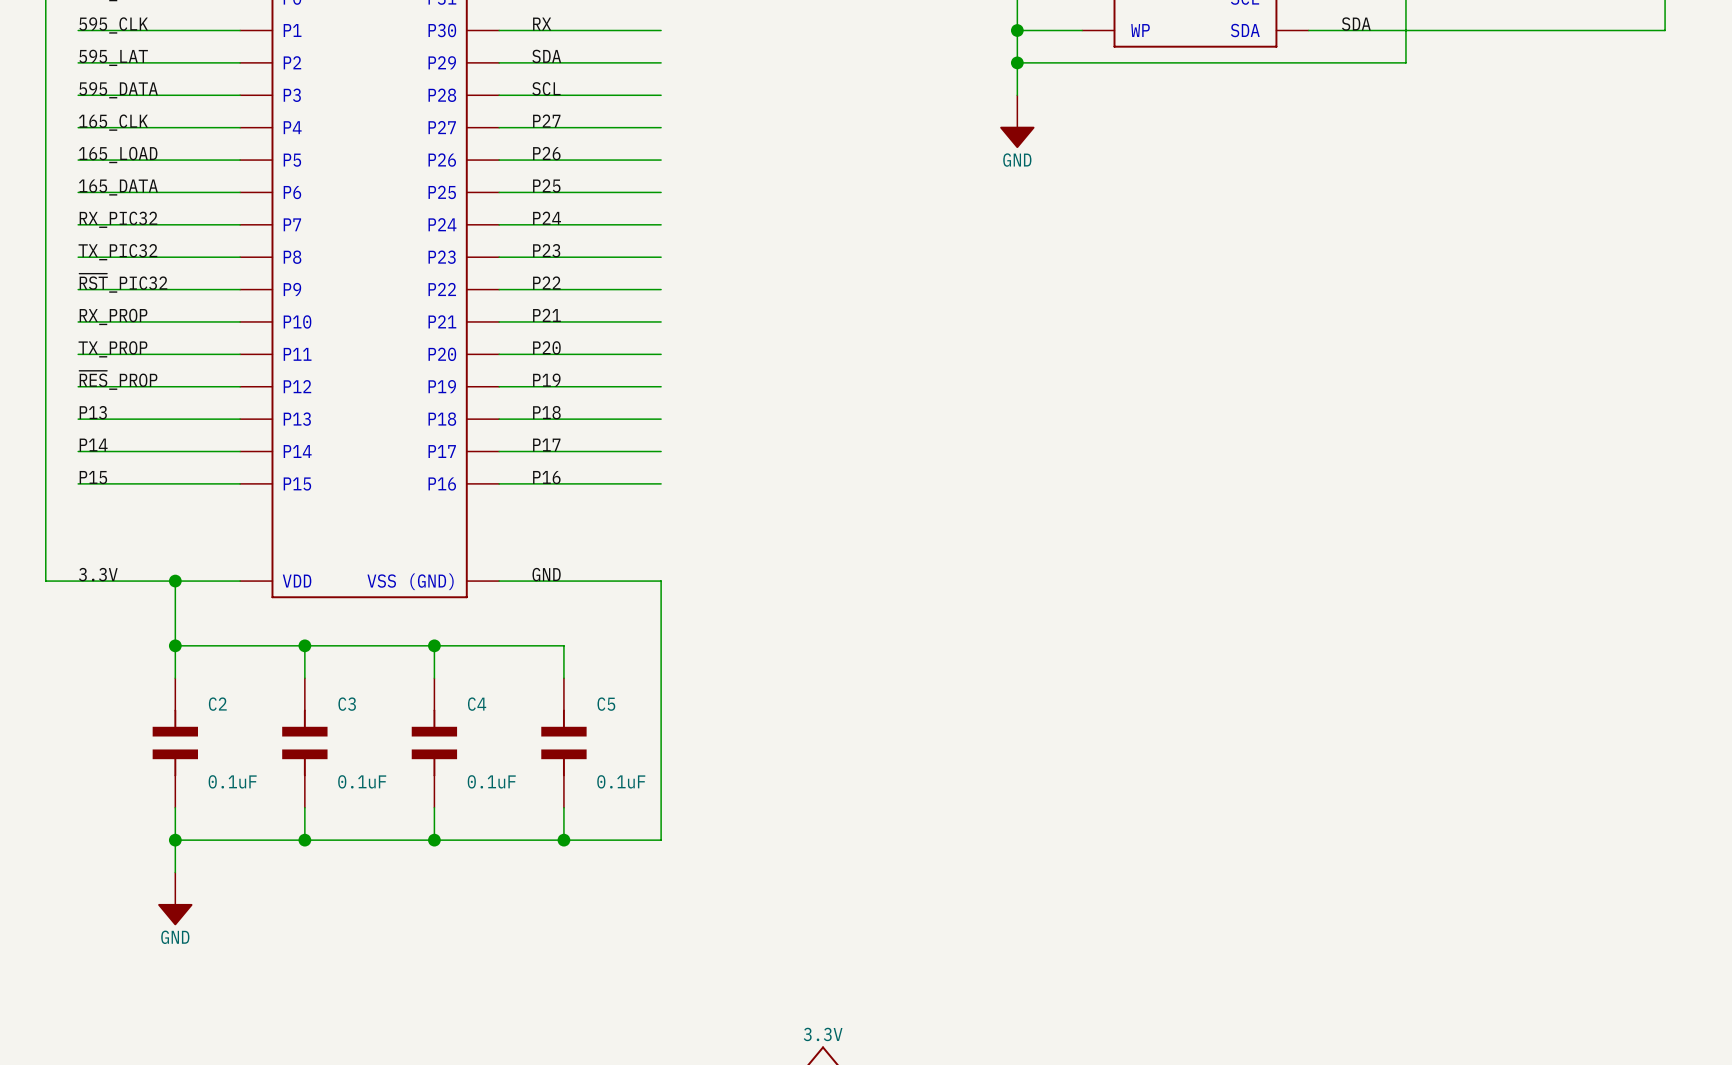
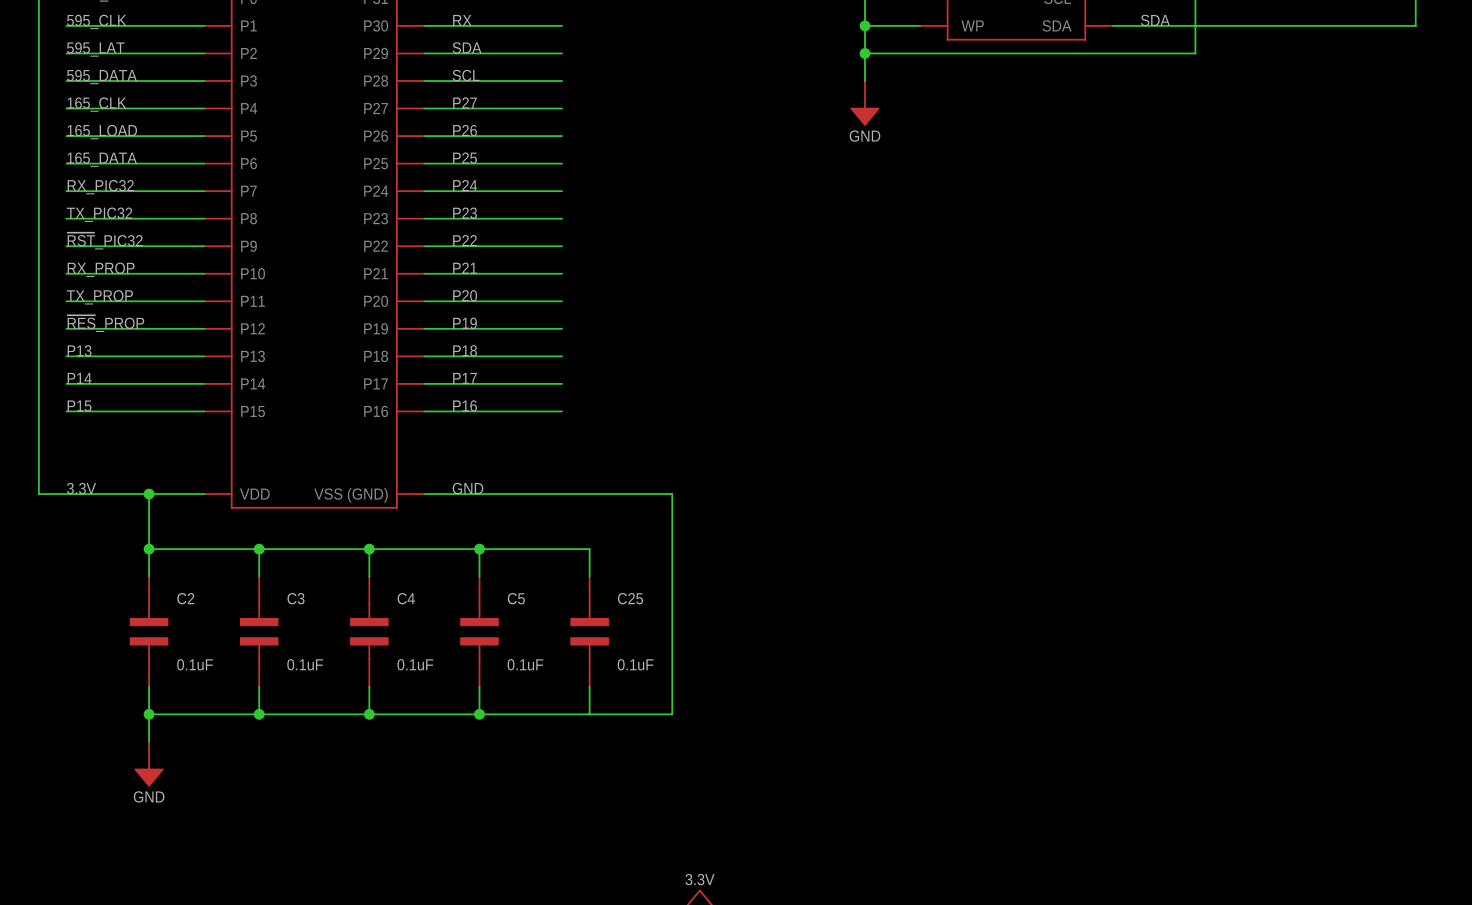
wire: (661, 581) (661, 840) -> (562, 494) (672, 494) (672, 714) (562, 714)
wire: none -> (479, 549) (589, 549) (589, 576)
junction: none -> (479, 549)
C25: none -> 0.1uF (589, 631)
wire: none -> (589, 686) (589, 714)

